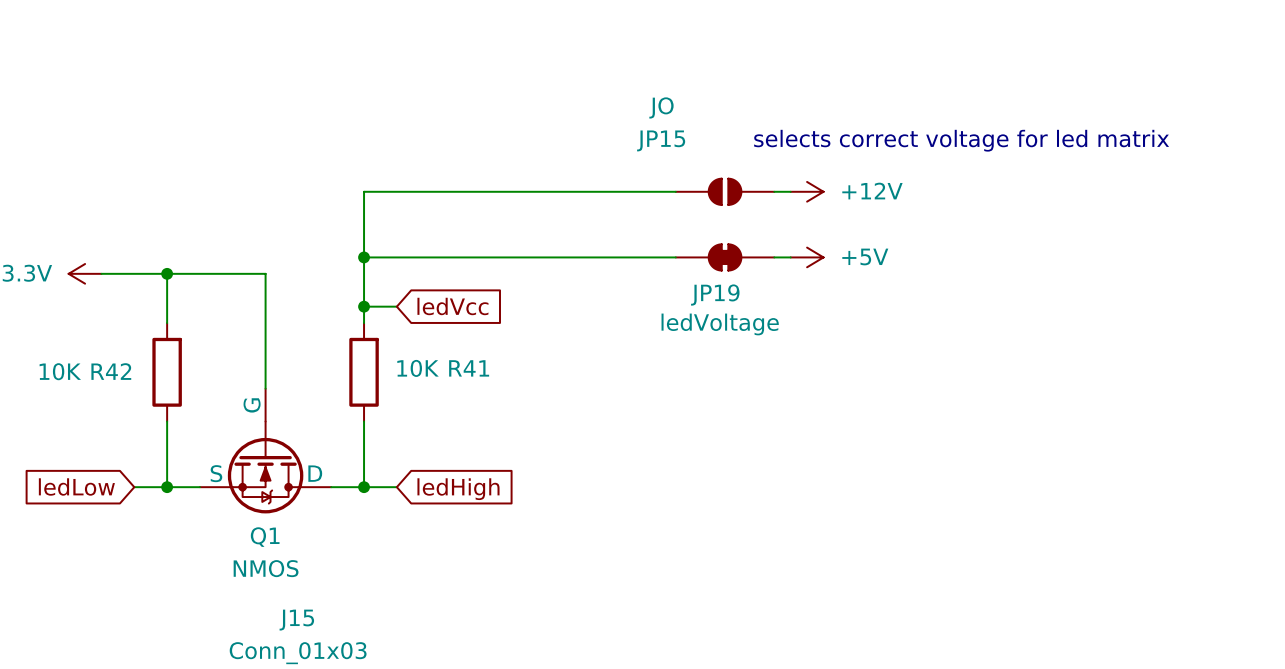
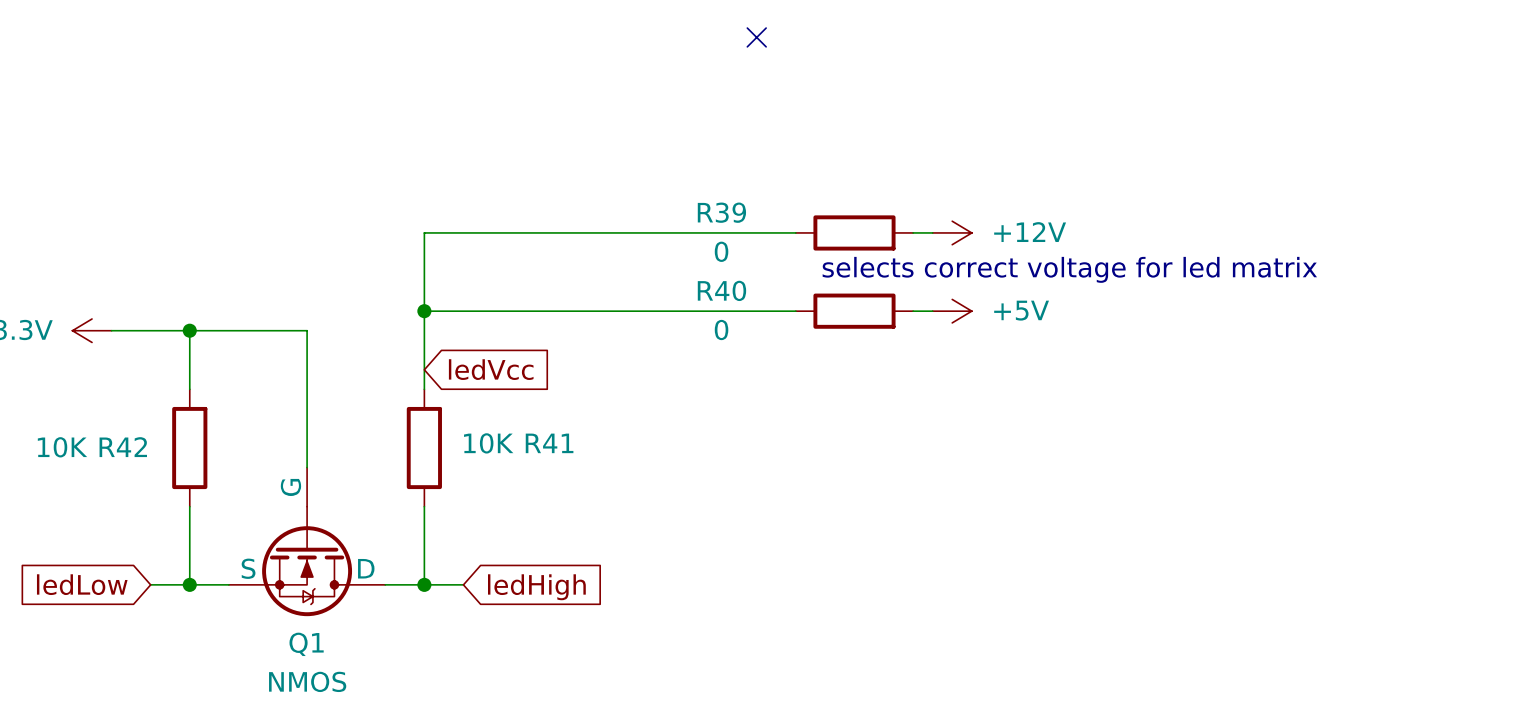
no-connect mark: none -> (756, 37)
text position: selects correct voltage for led matrix (961, 140) -> selects correct voltage for led matrix (1069, 269)
JP15: JO (725, 191) -> none
R39: none -> 0 (854, 232)
JP19: ledVoltage (725, 257) -> none
R40: none -> 0 (854, 311)
wire: (364, 306) (396, 306) -> none
junction: (364, 306) -> none
global label position: ledVcc (452, 306) -> ledVcc (491, 369)

